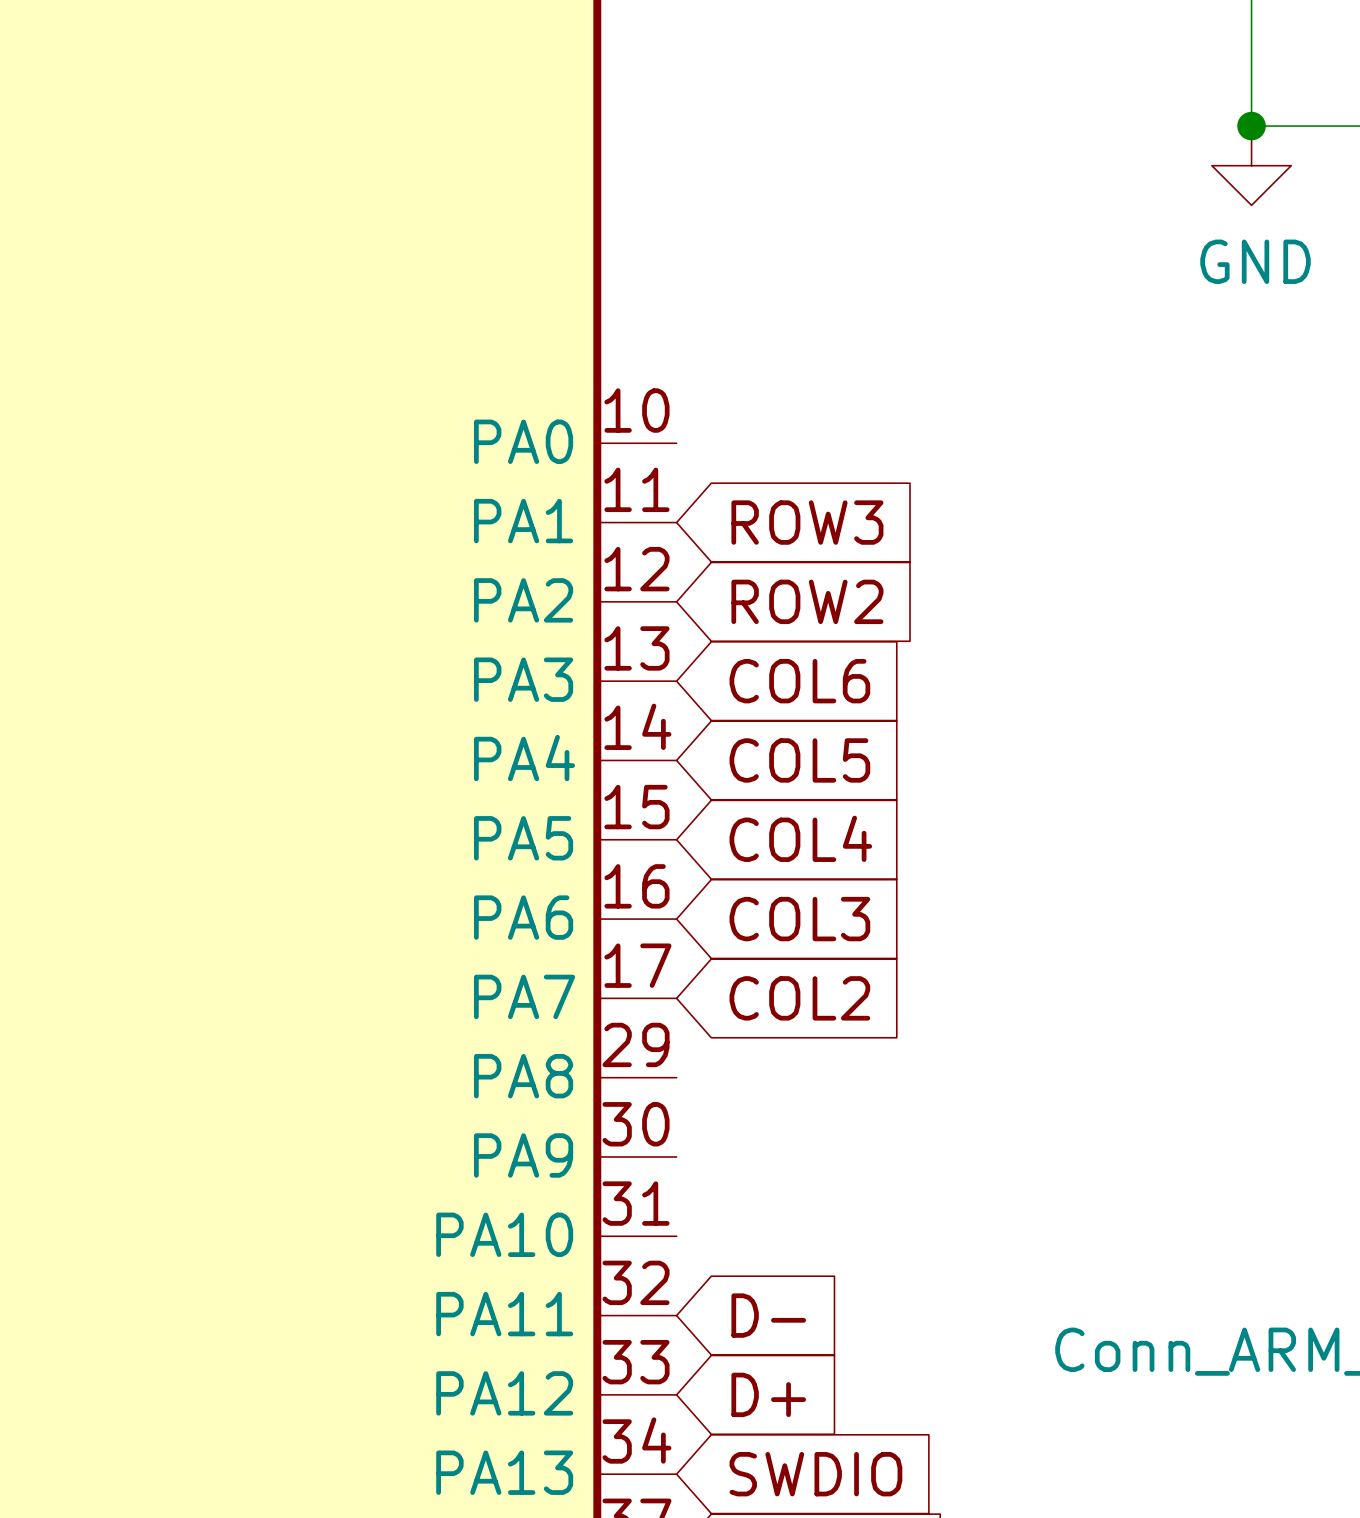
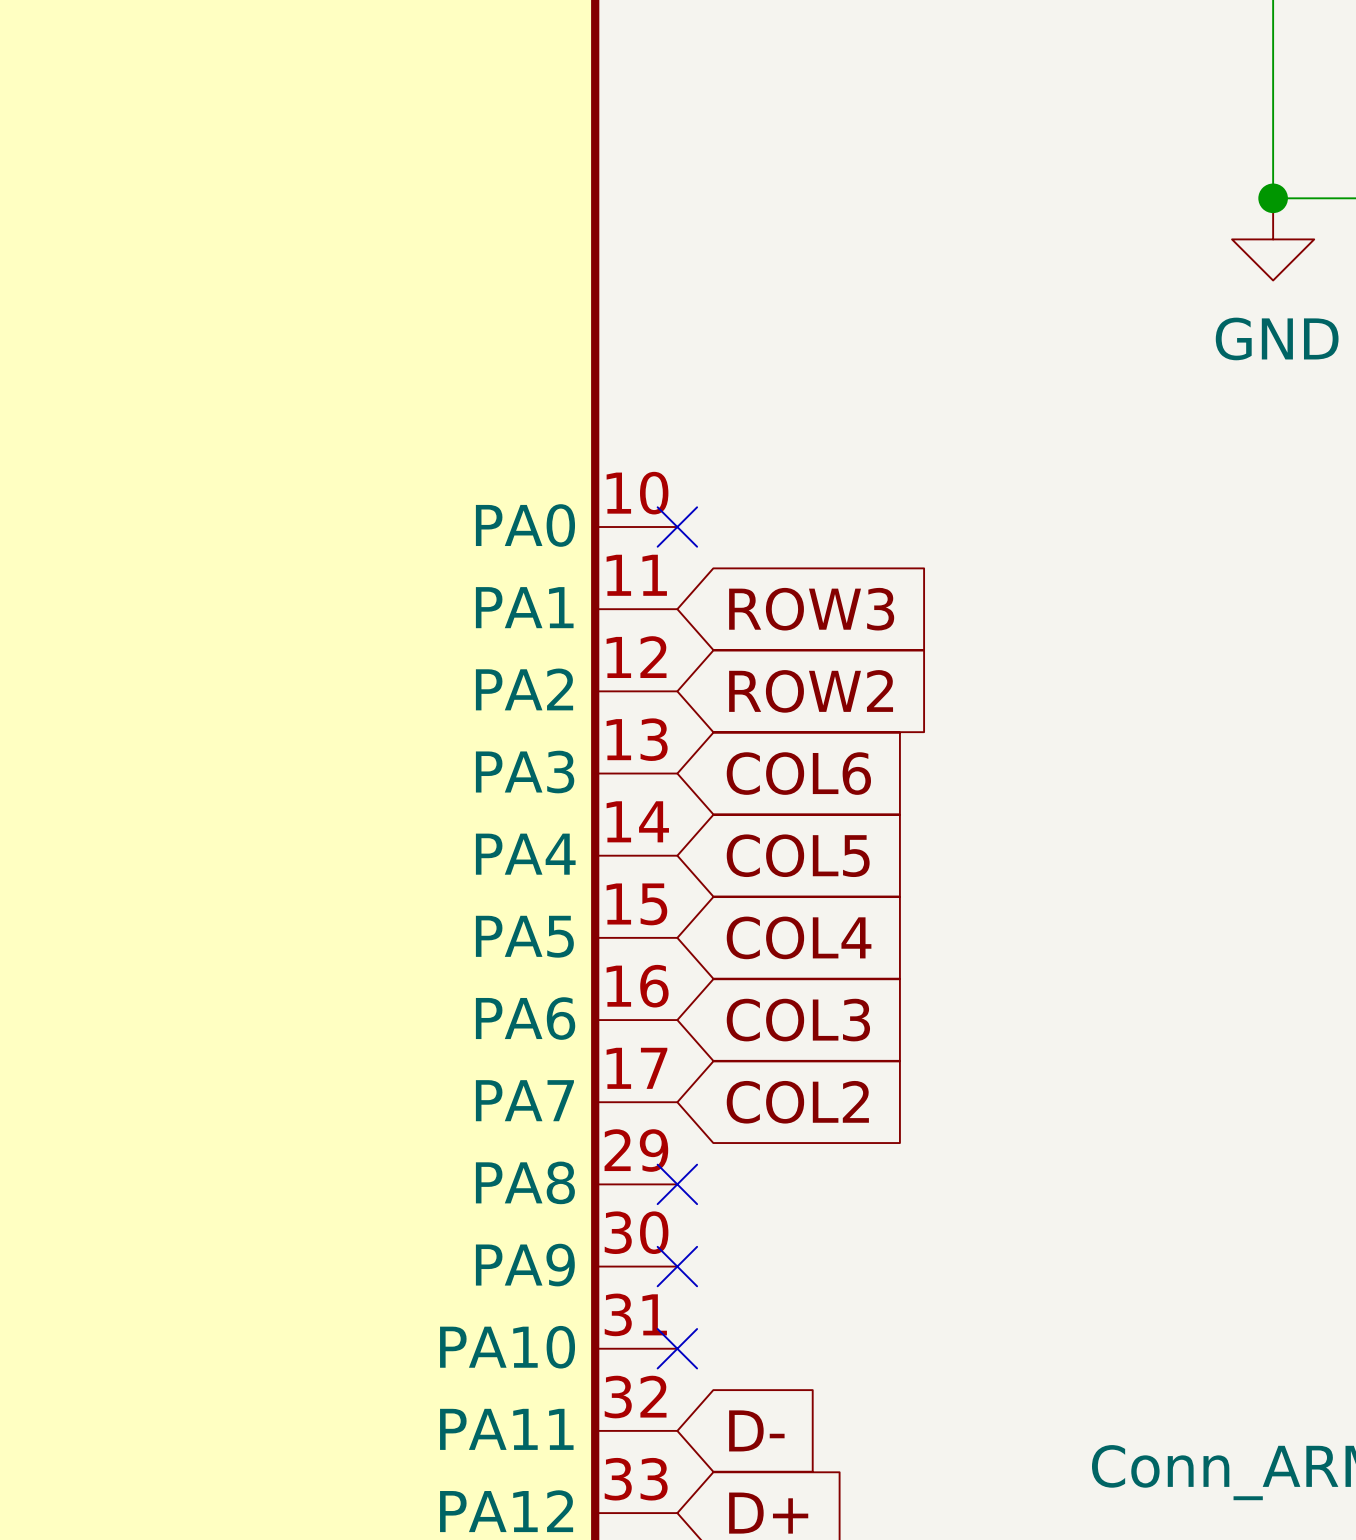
no-connect mark: none -> (677, 527)
no-connect mark: none -> (677, 1184)
no-connect mark: none -> (677, 1266)
no-connect mark: none -> (677, 1348)

